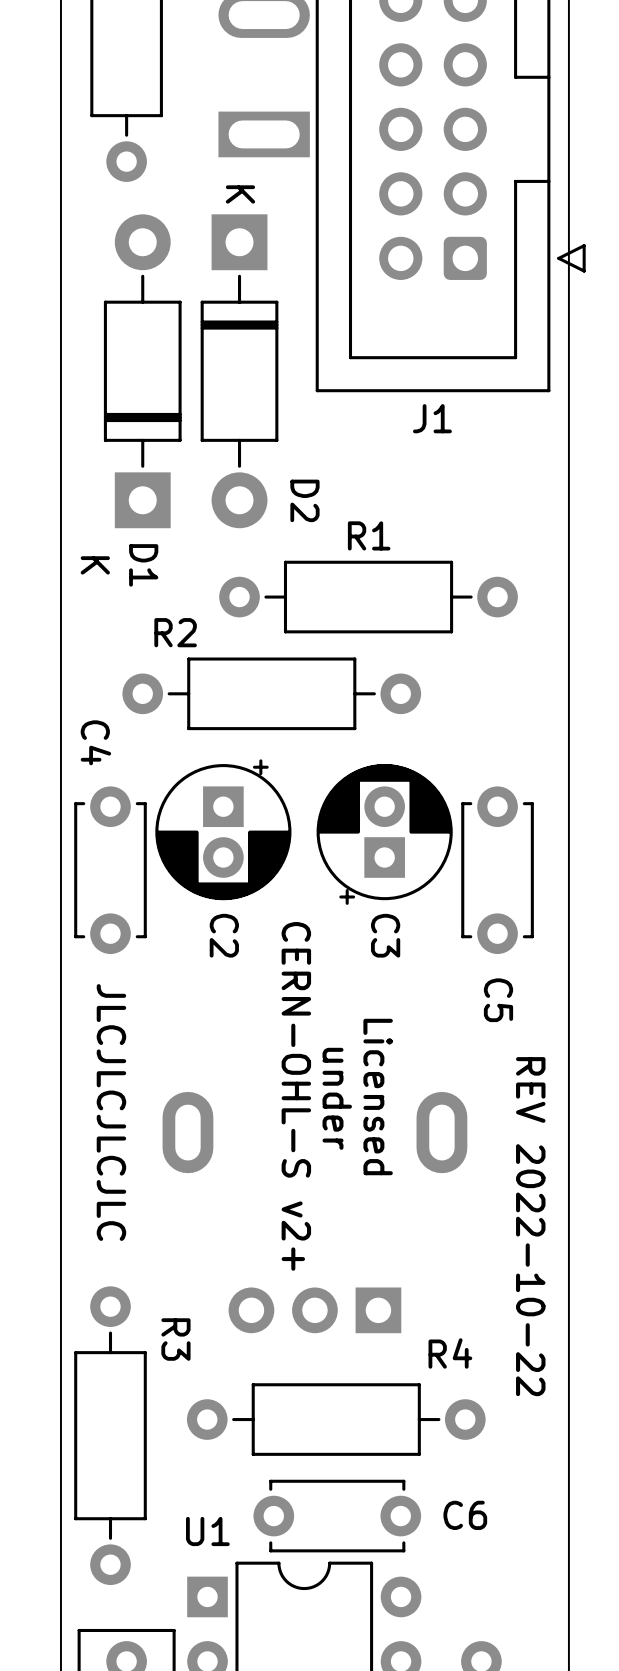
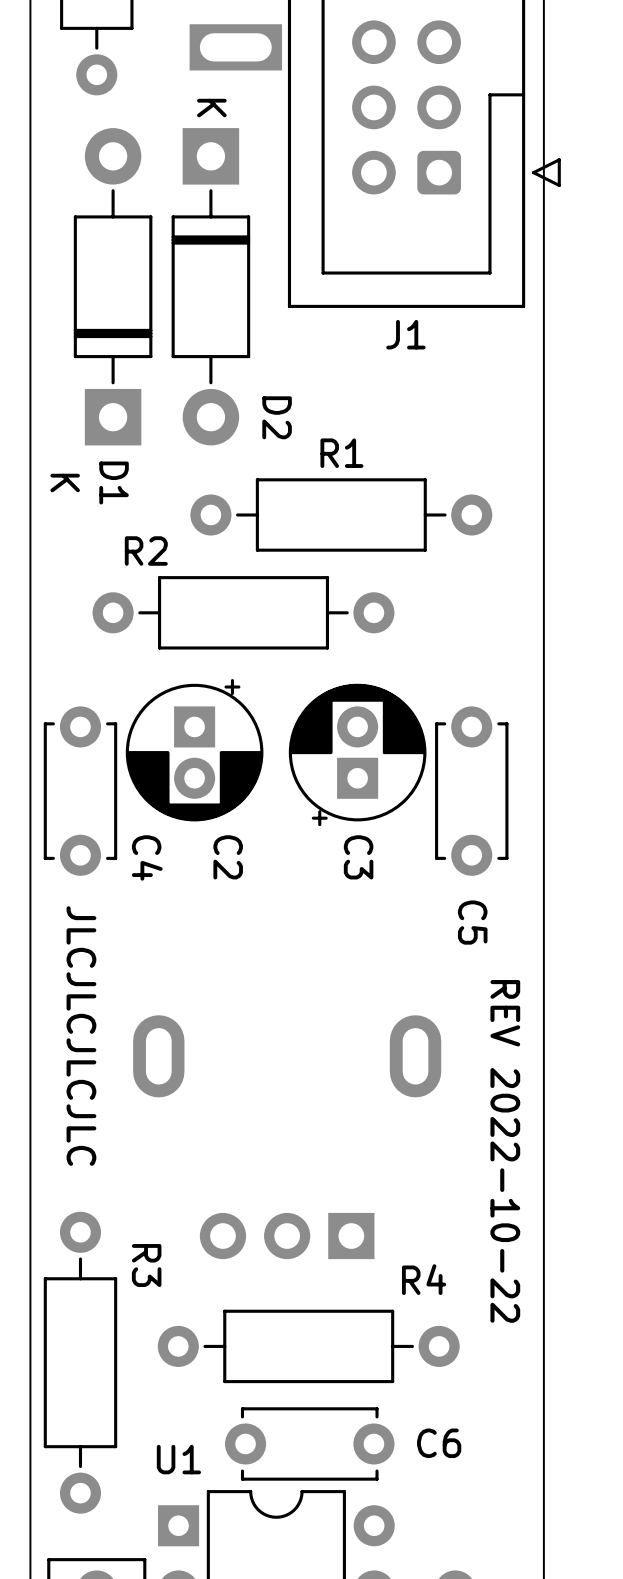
C4 name position: C4 (95, 742) -> C4 (147, 857)
C2 name position: C2 (224, 935) -> C2 (228, 857)
text: CERN-OHL-S v2+ (296, 1096) -> none
text: Licensed (378, 1097) -> none
text: under (337, 1098) -> none

